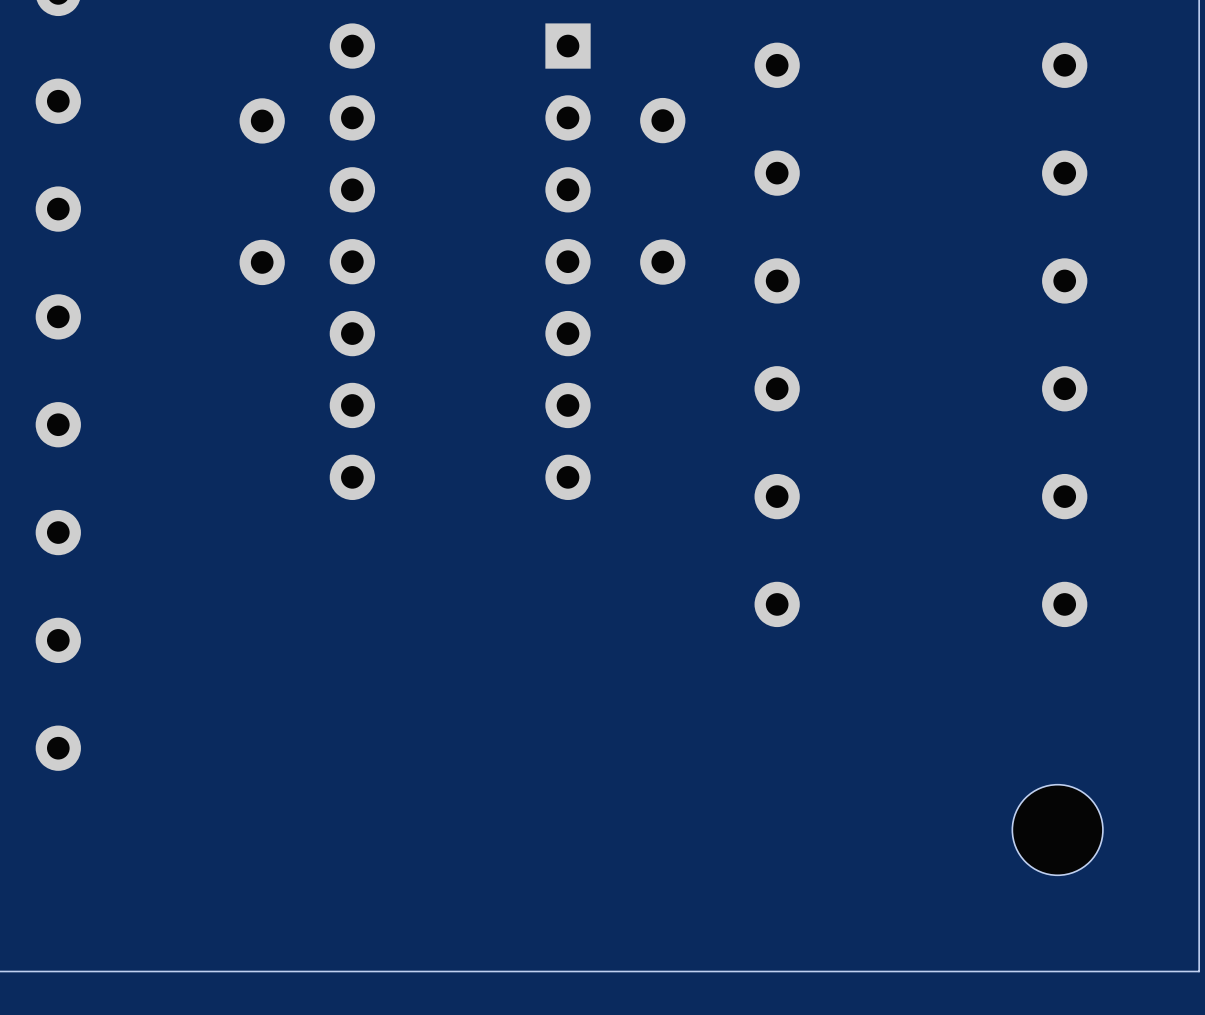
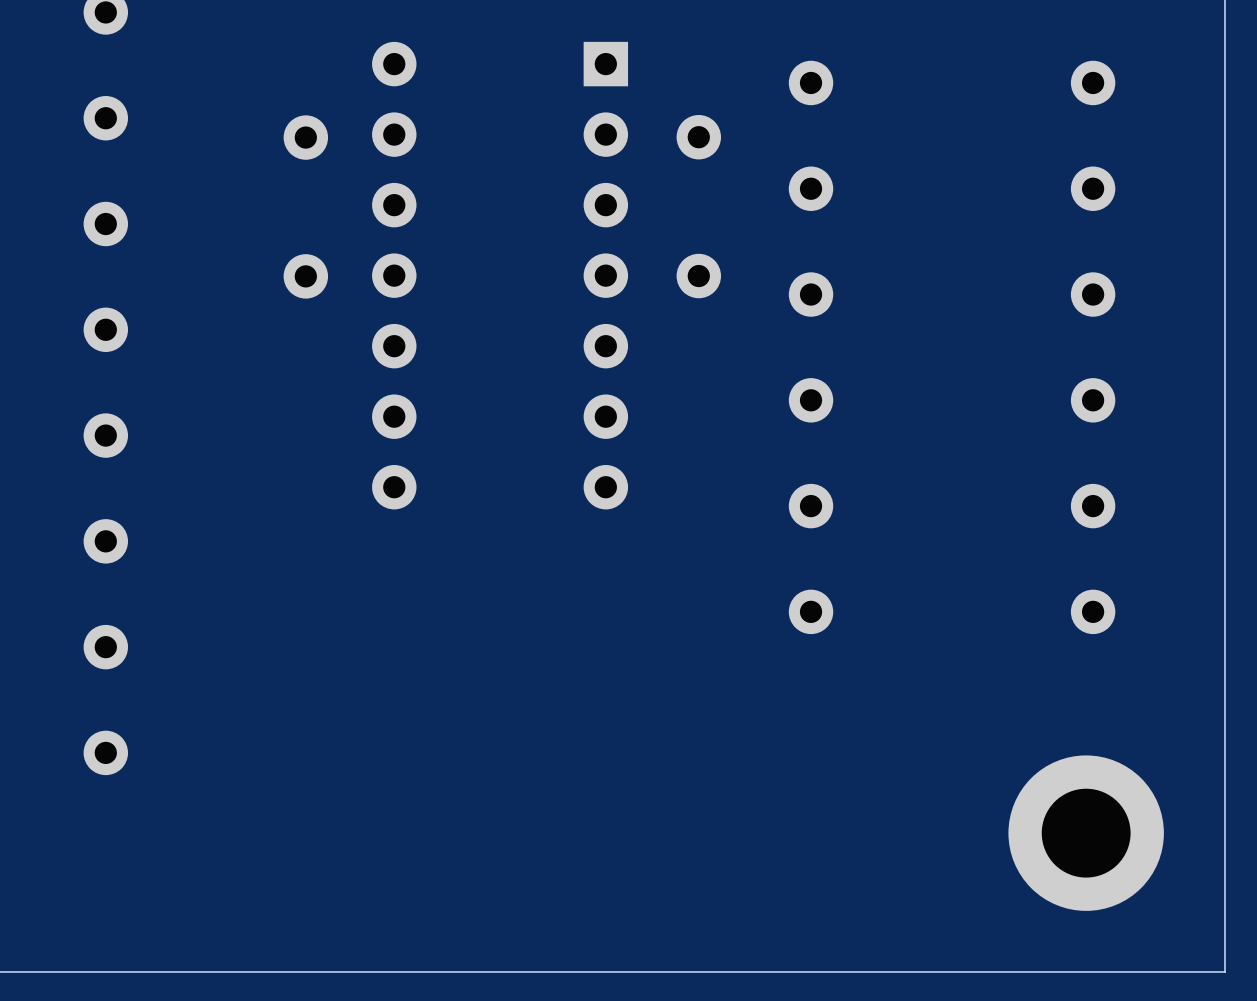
part footprint: [1012, 784, 1103, 876] -> [1008, 755, 1164, 911]

